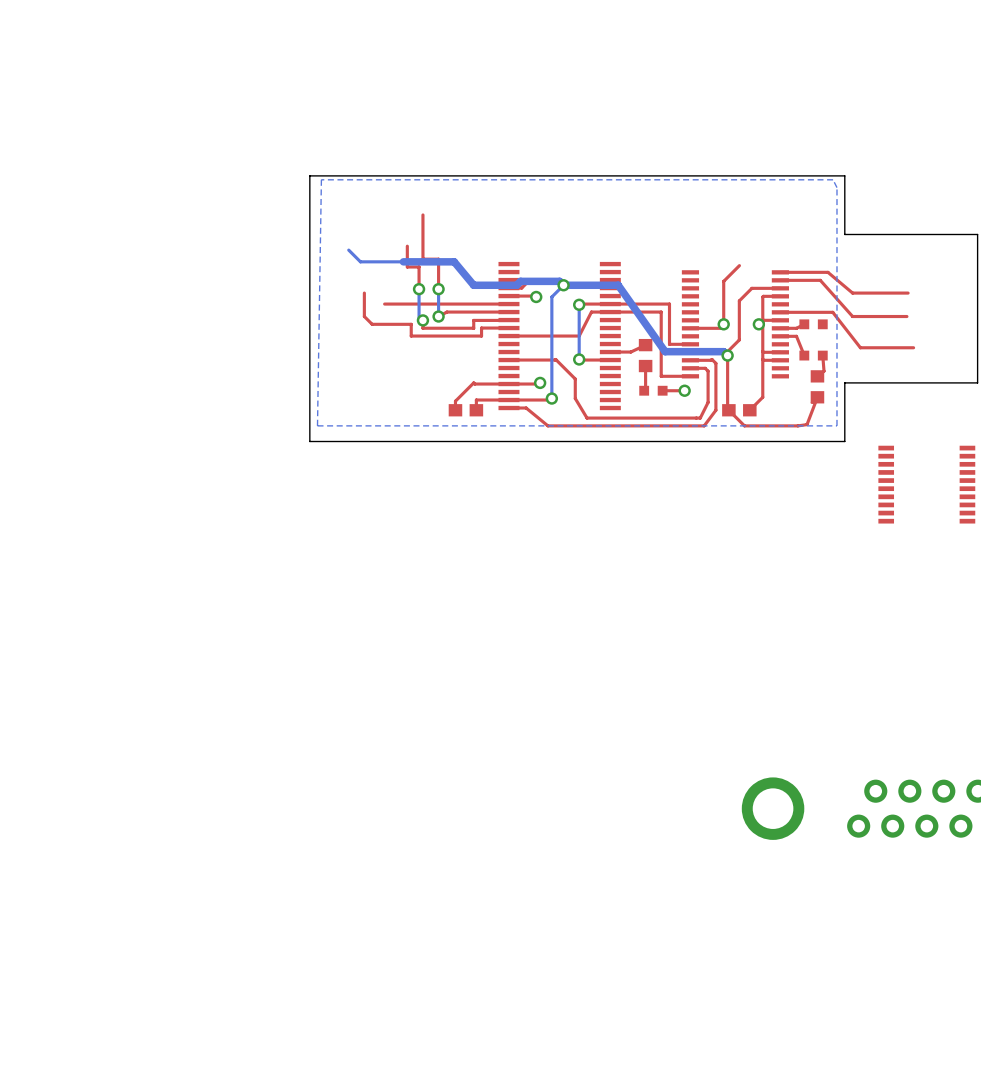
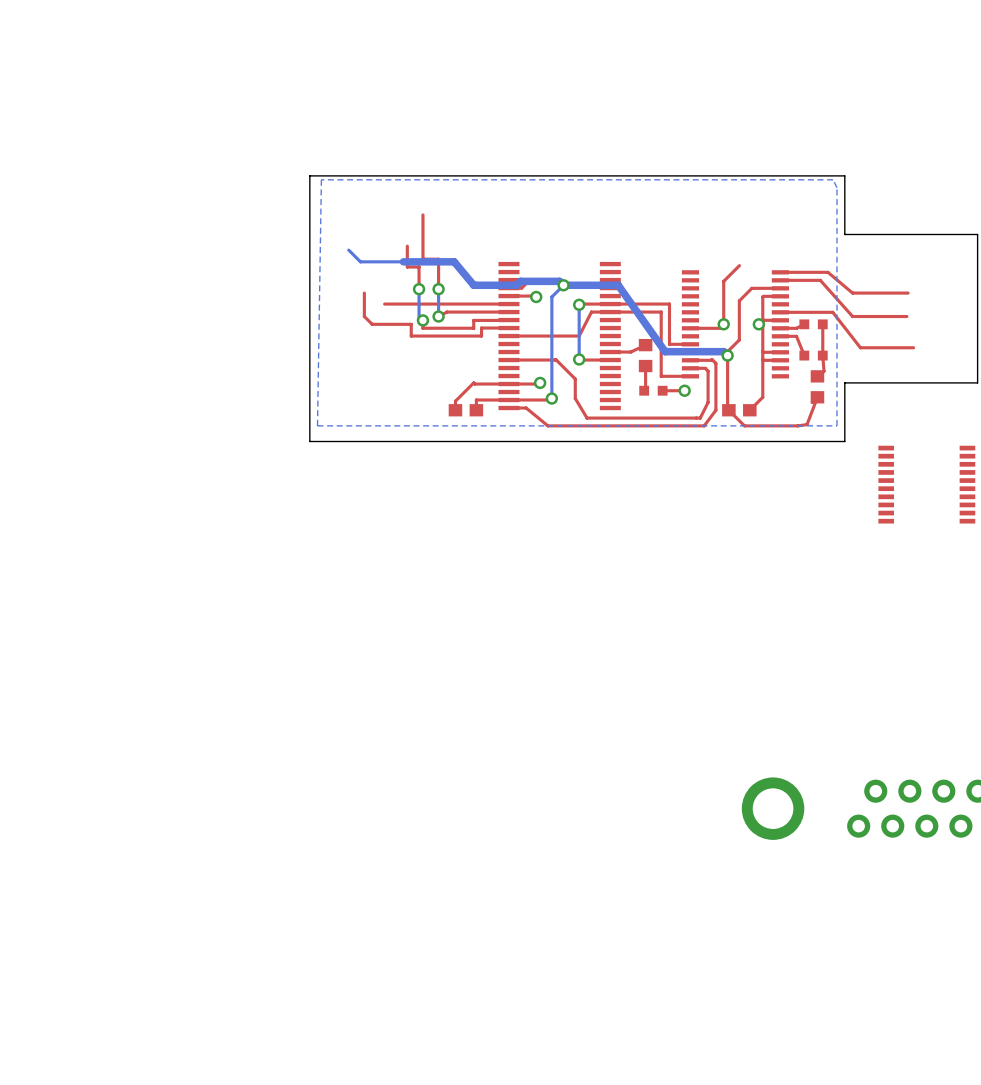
top track: none -> (822, 324) (822, 355)

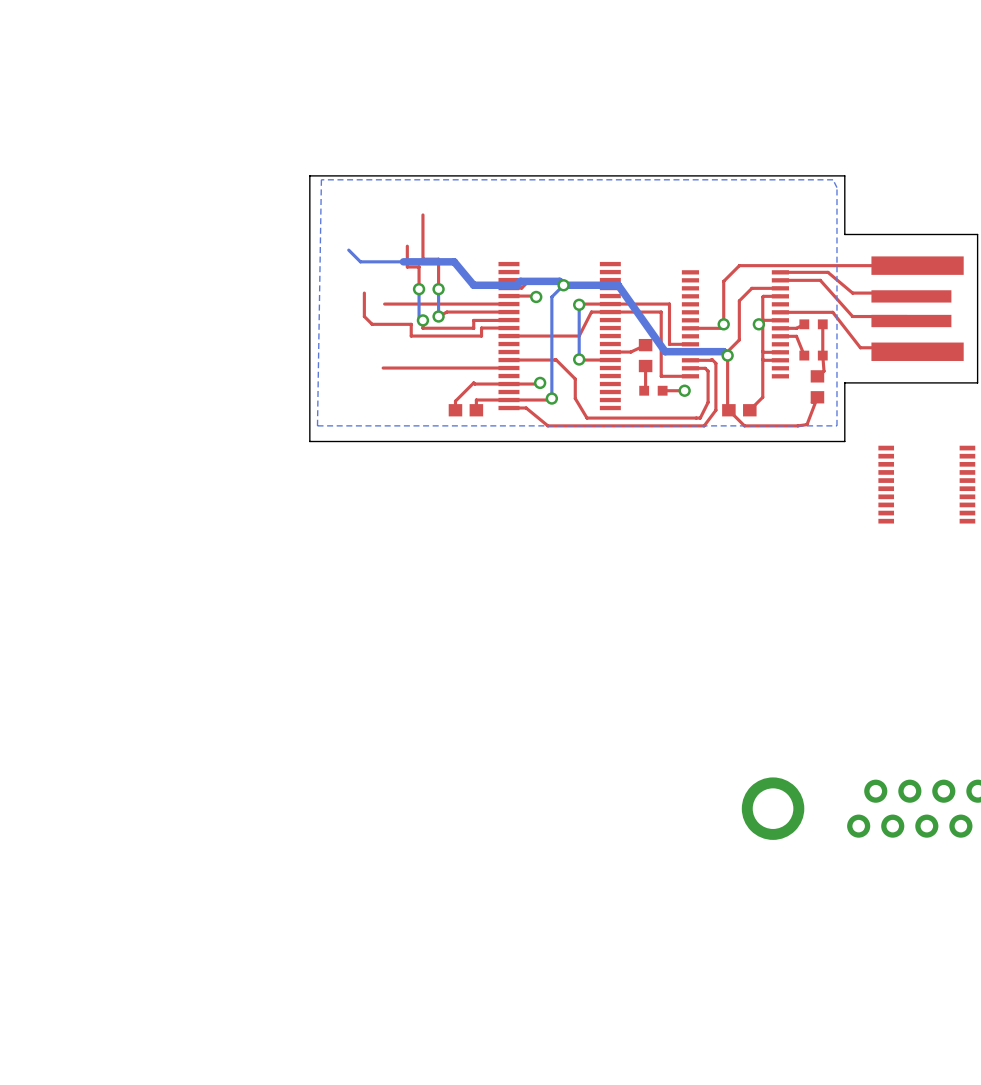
top track: none -> (917, 265) (739, 265)
part: none -> (917, 308)
top track: none -> (508, 368) (383, 368)

